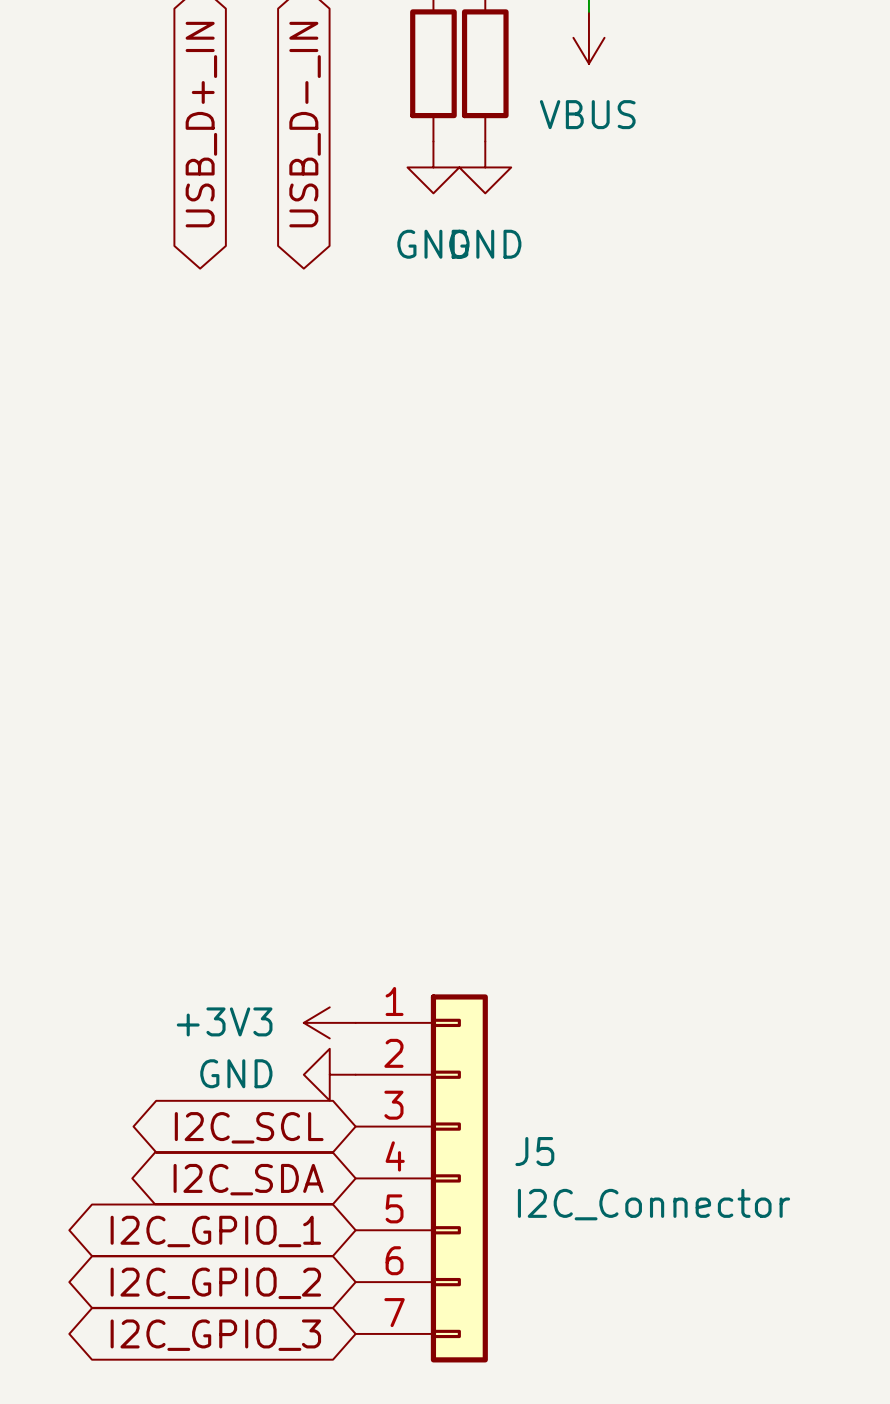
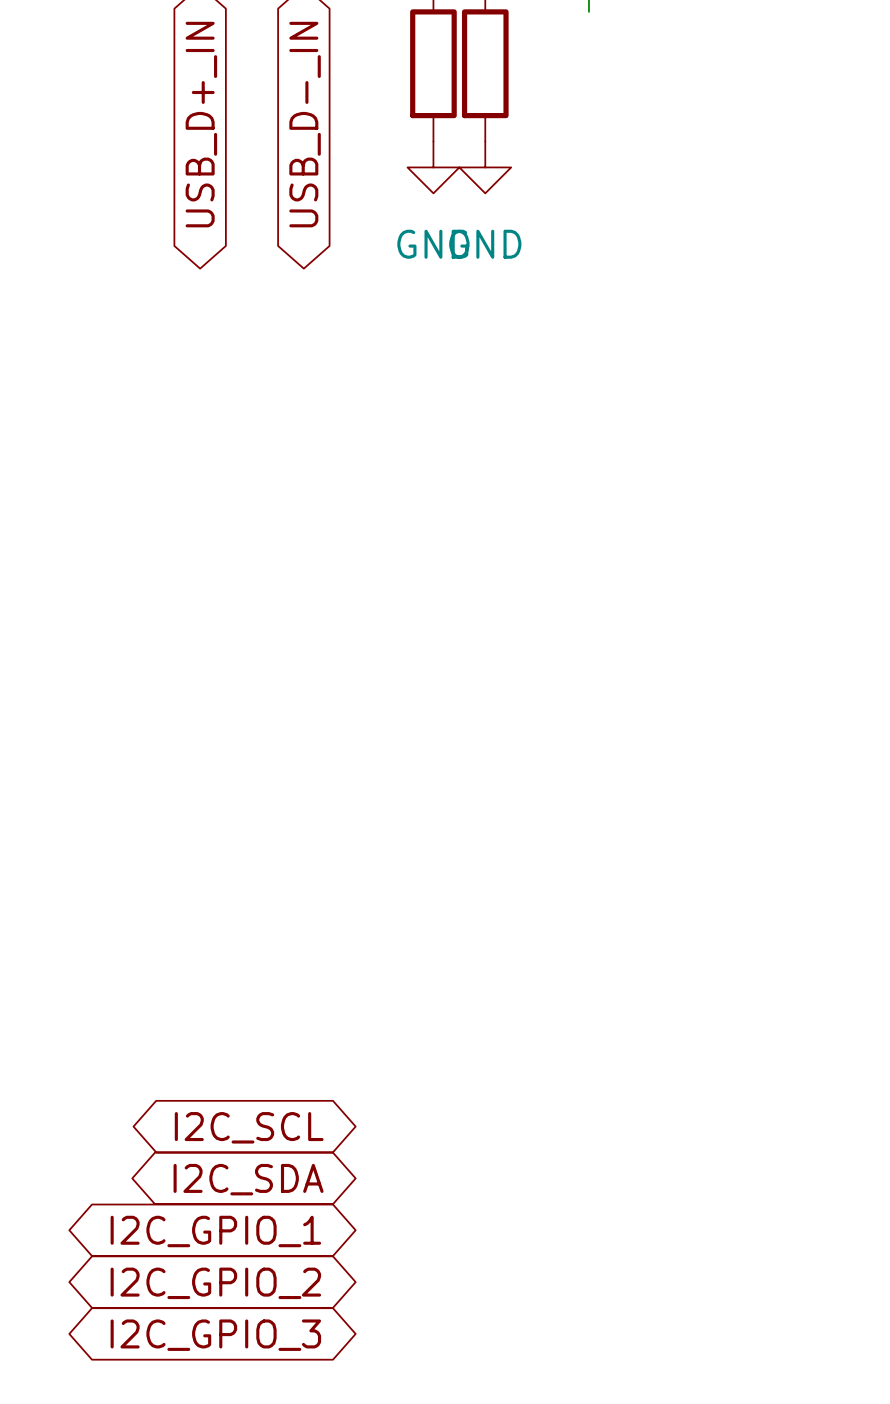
power symbol: VBUS (588, 37) -> none
power symbol: +3V3 (329, 1022) -> none
power symbol: GND (329, 1074) -> none
J5: I2C_Connector (421, 1178) -> none

